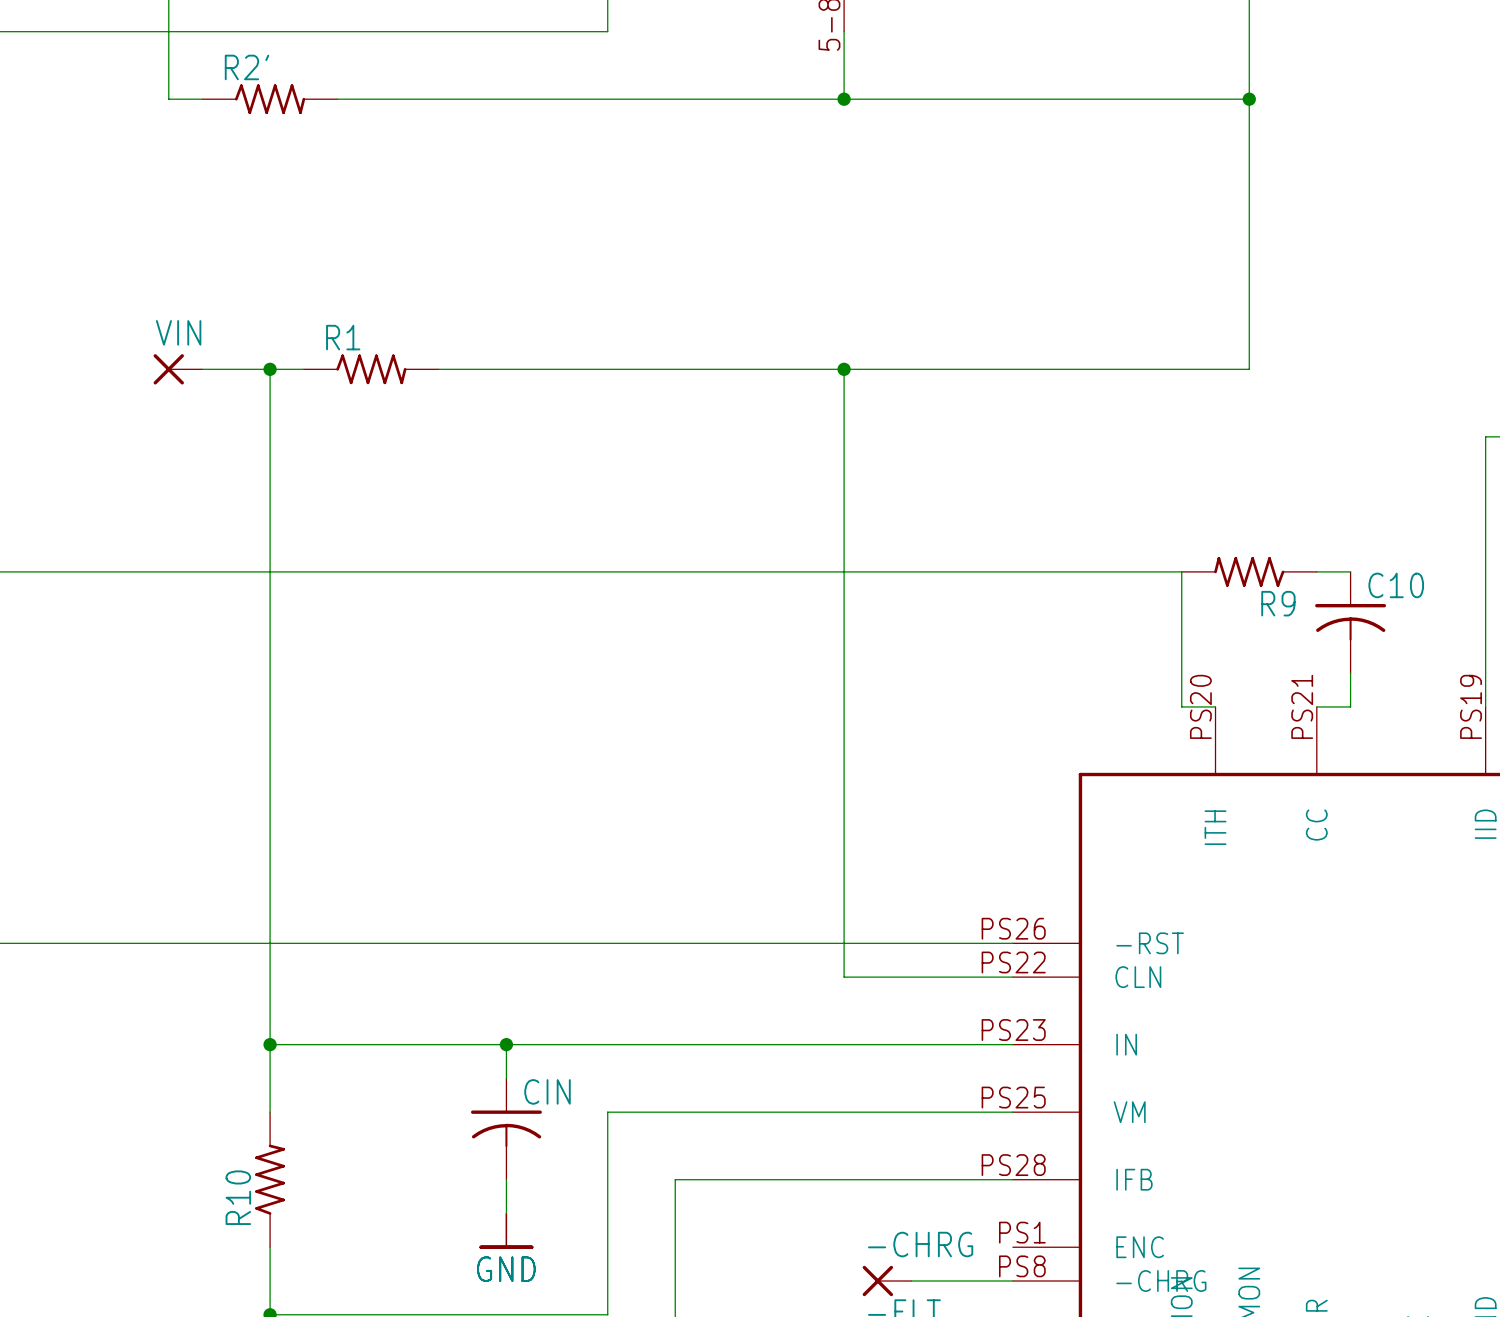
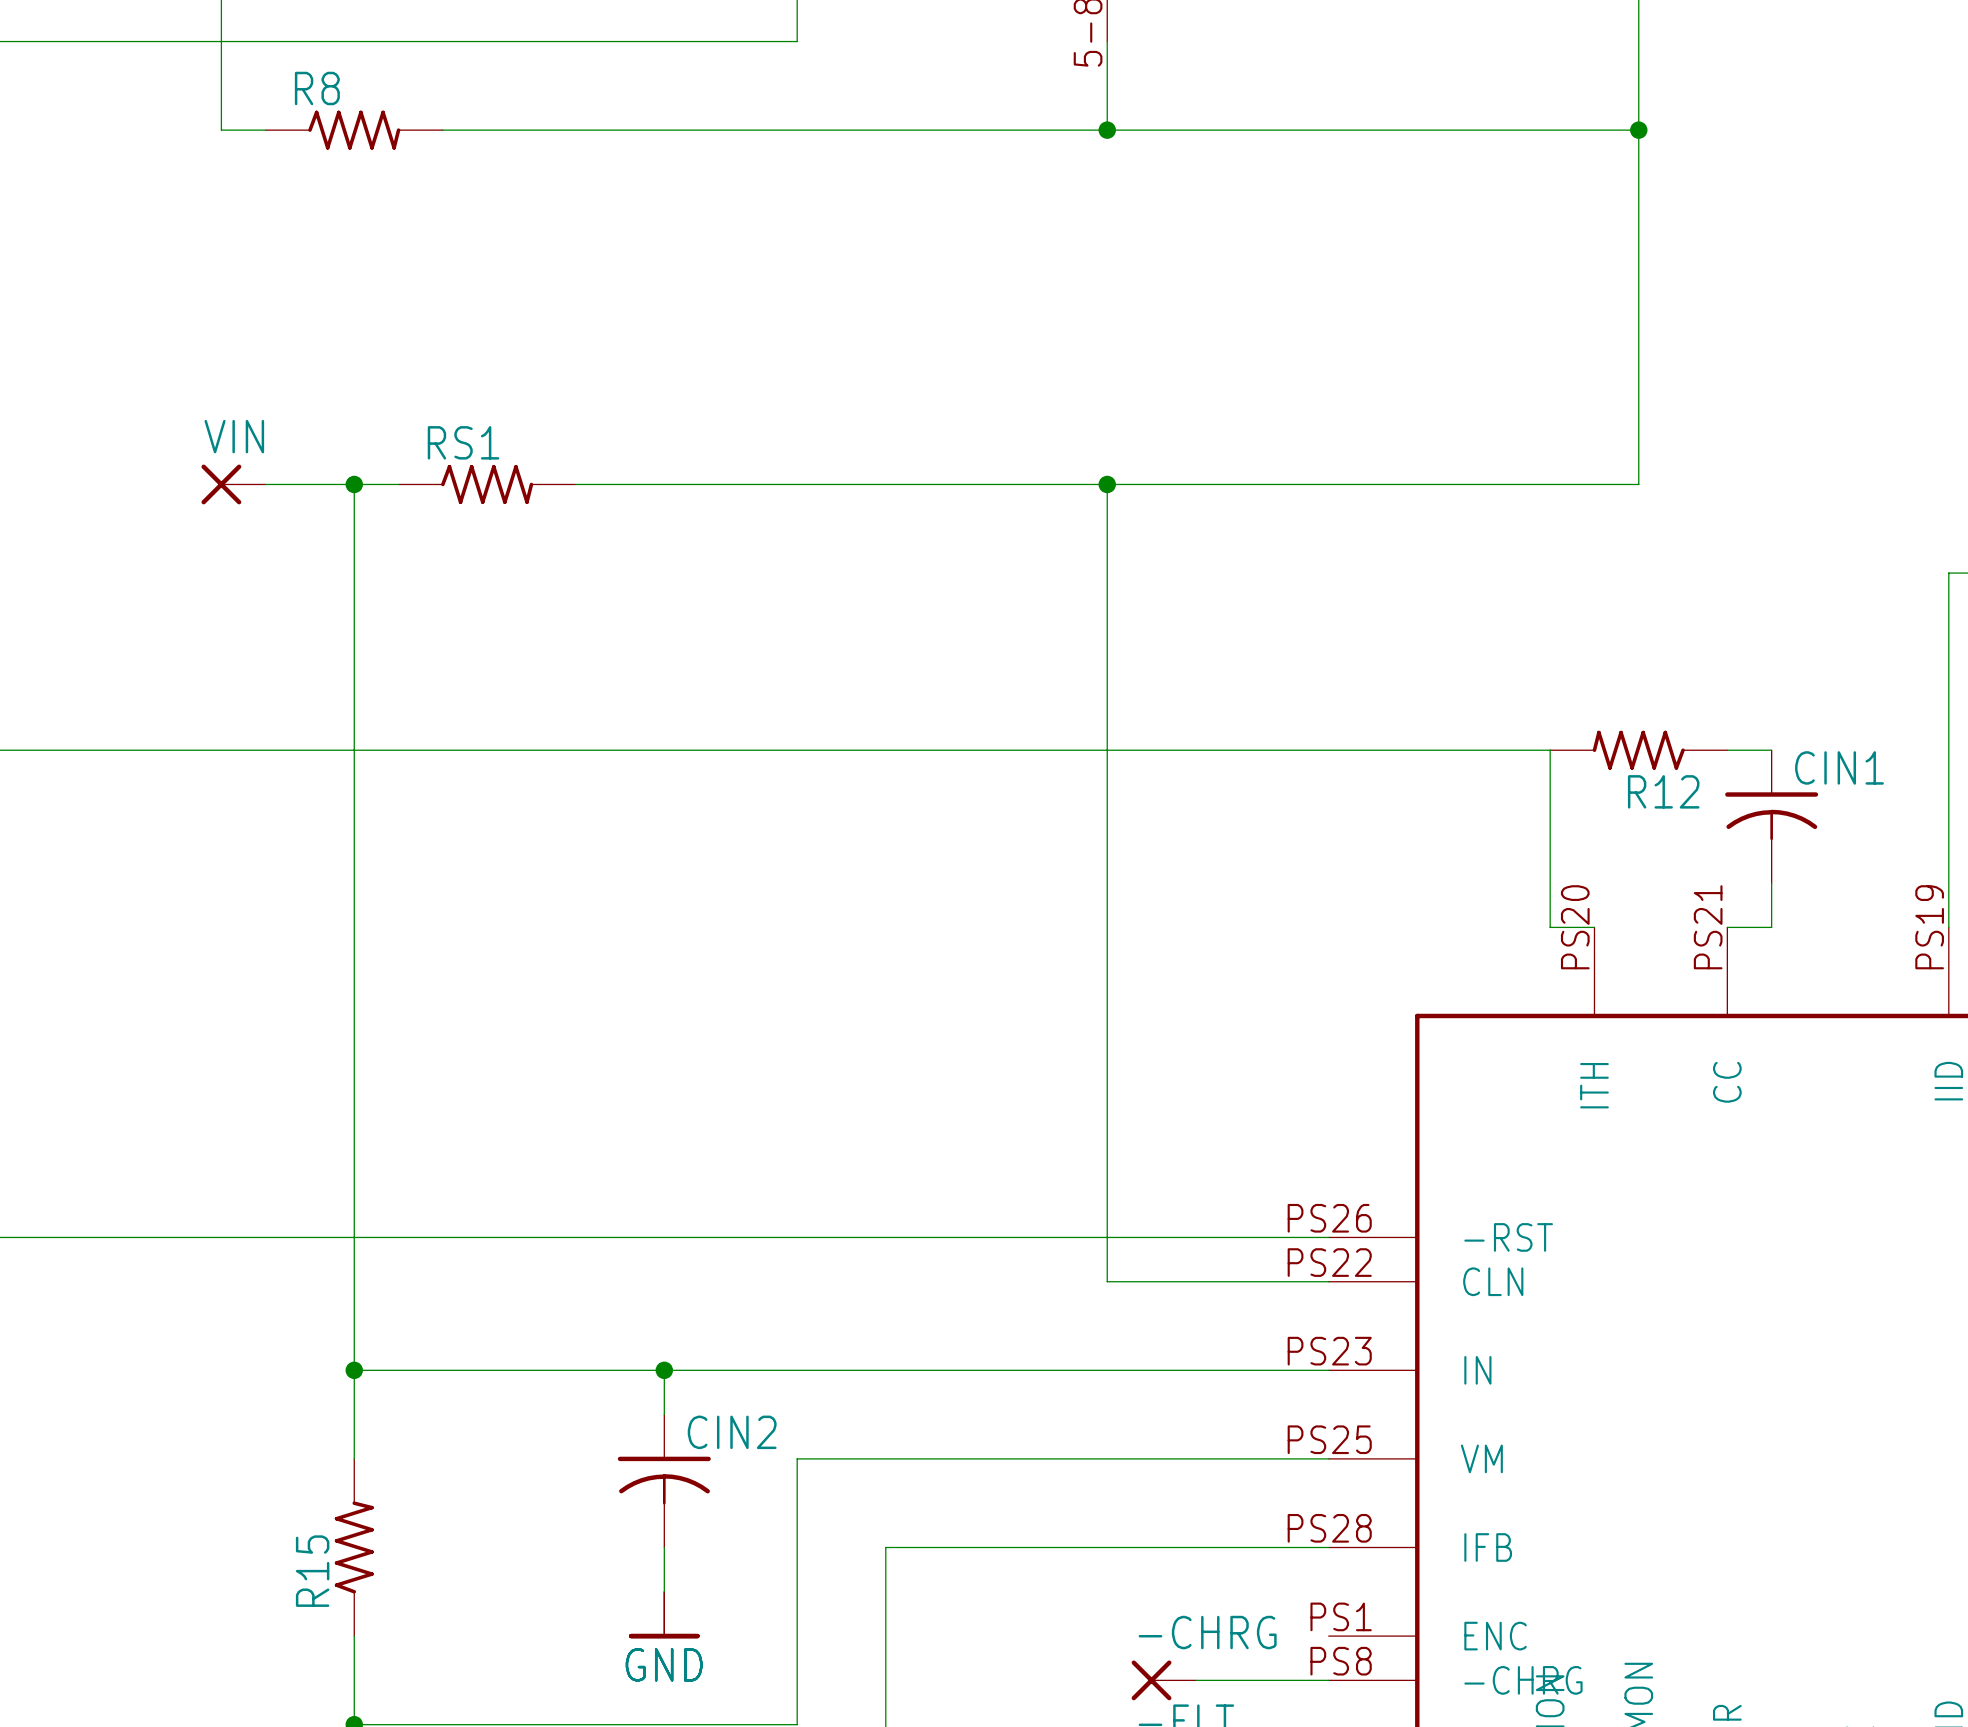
R2' name: R2' (247, 67) -> R8 (317, 88)
R1 name: R1 (343, 337) -> RS1 (463, 442)
C10 name: C10 (1396, 585) -> CIN1 (1839, 767)
R9 name: R9 (1278, 603) -> R12 (1663, 791)
CIN name: CIN (547, 1091) -> CIN2 (732, 1432)
R10 name: R10 (238, 1197) -> R15 (312, 1571)

